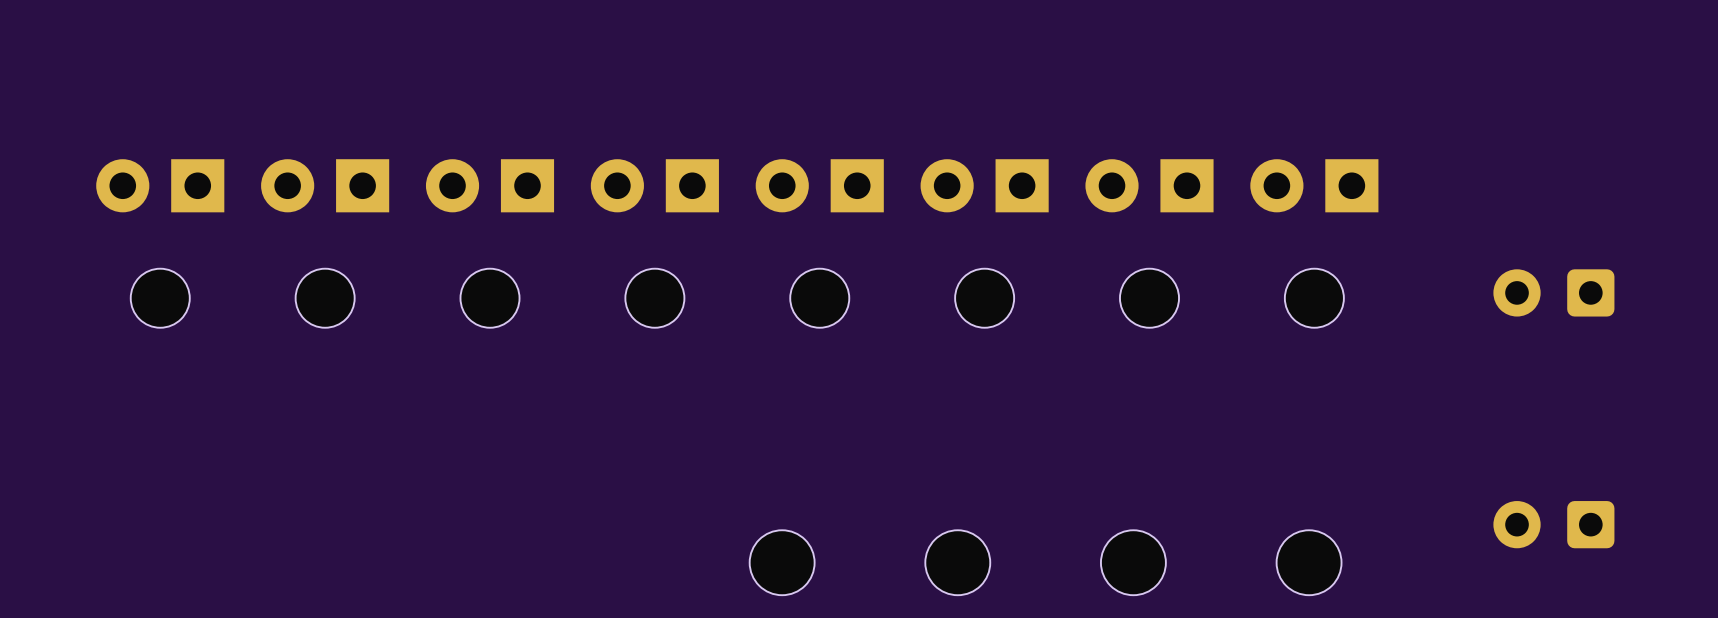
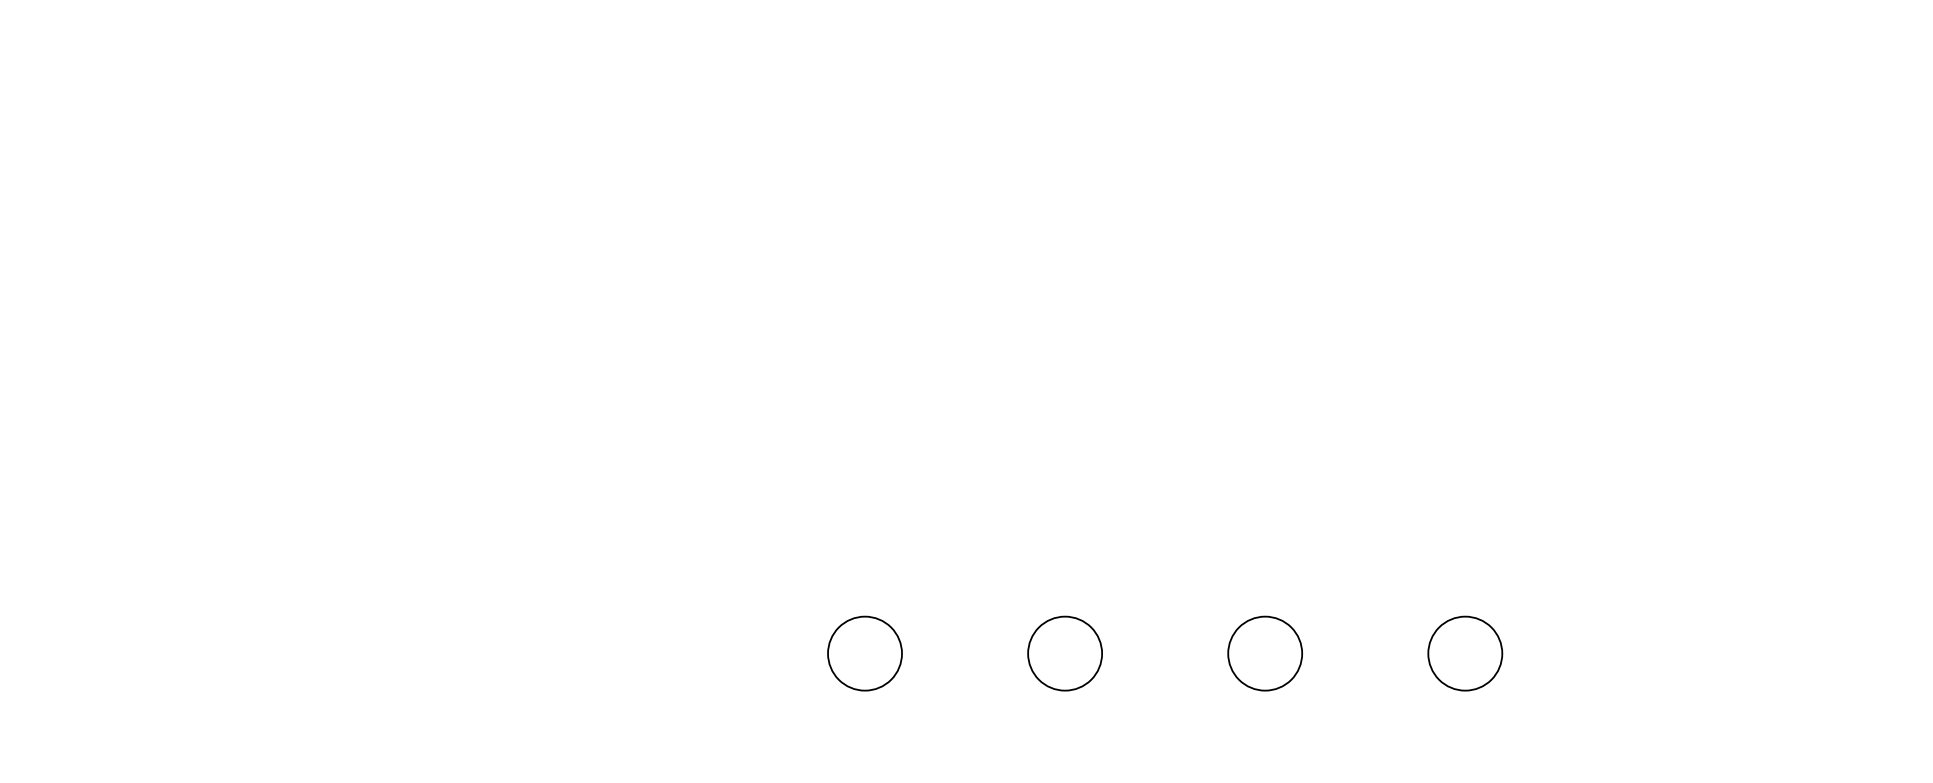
part: (160, 243) -> none
part: (325, 243) -> none
part: (490, 243) -> none
part: (654, 243) -> none
part: (819, 243) -> none
part: (984, 243) -> none
part: (1149, 243) -> none
part: (1314, 243) -> none
part: (1553, 292) -> none
part: (1553, 524) -> none

